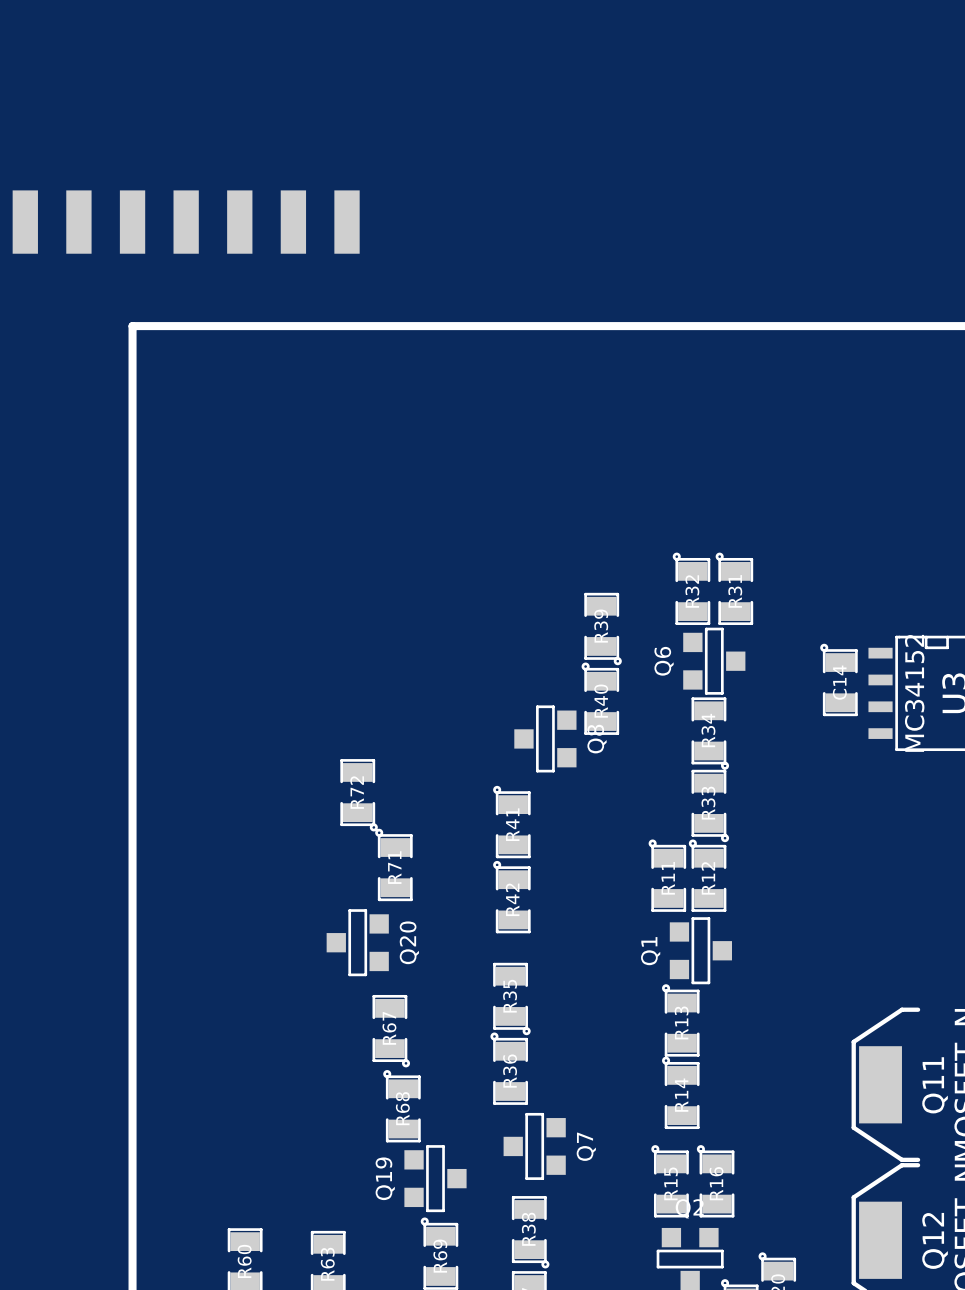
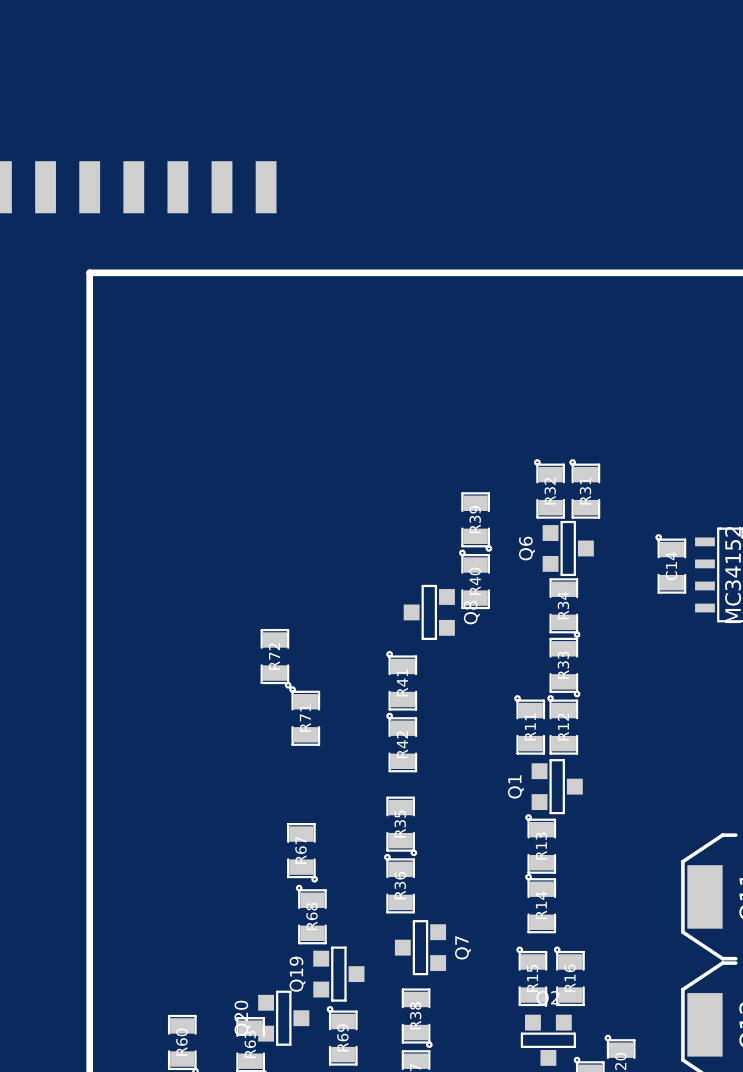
Q20 rotation: 0° (357, 942) -> 180° (283, 1018)
Q20 position: (357, 942) -> (283, 1018)

